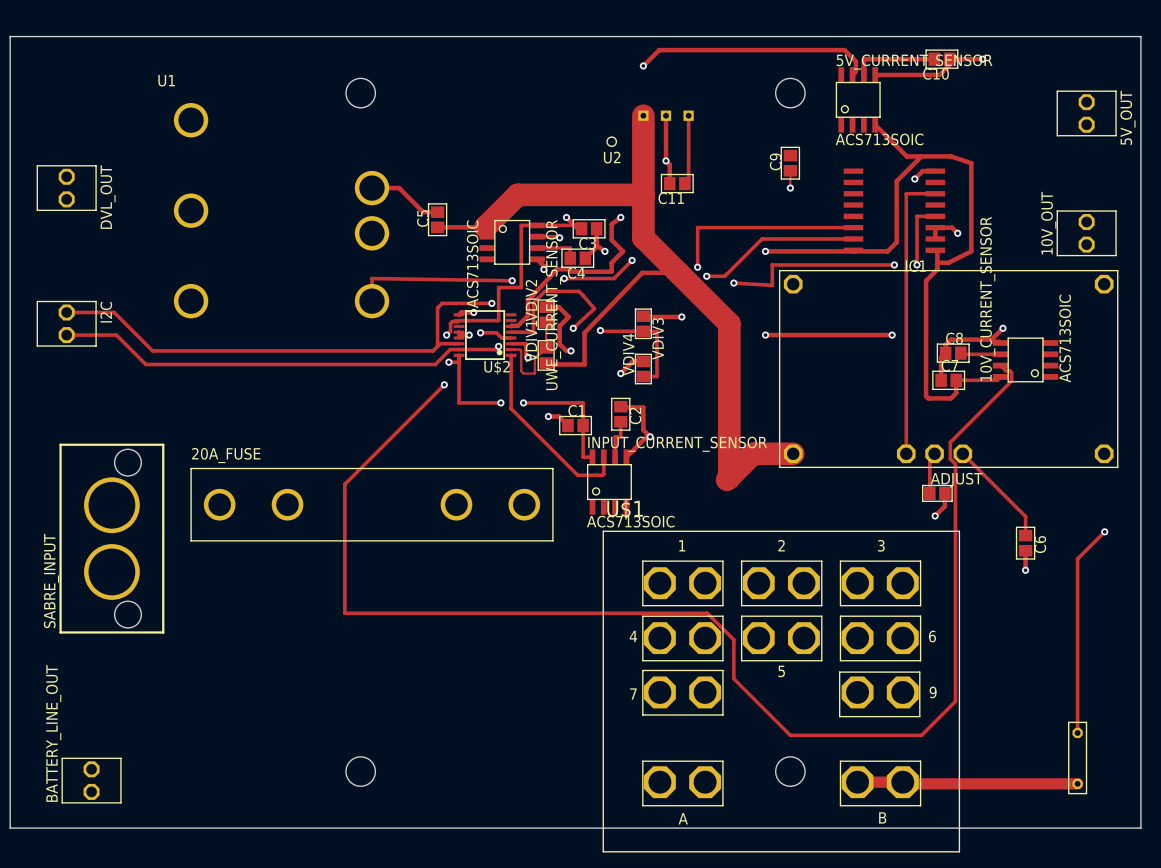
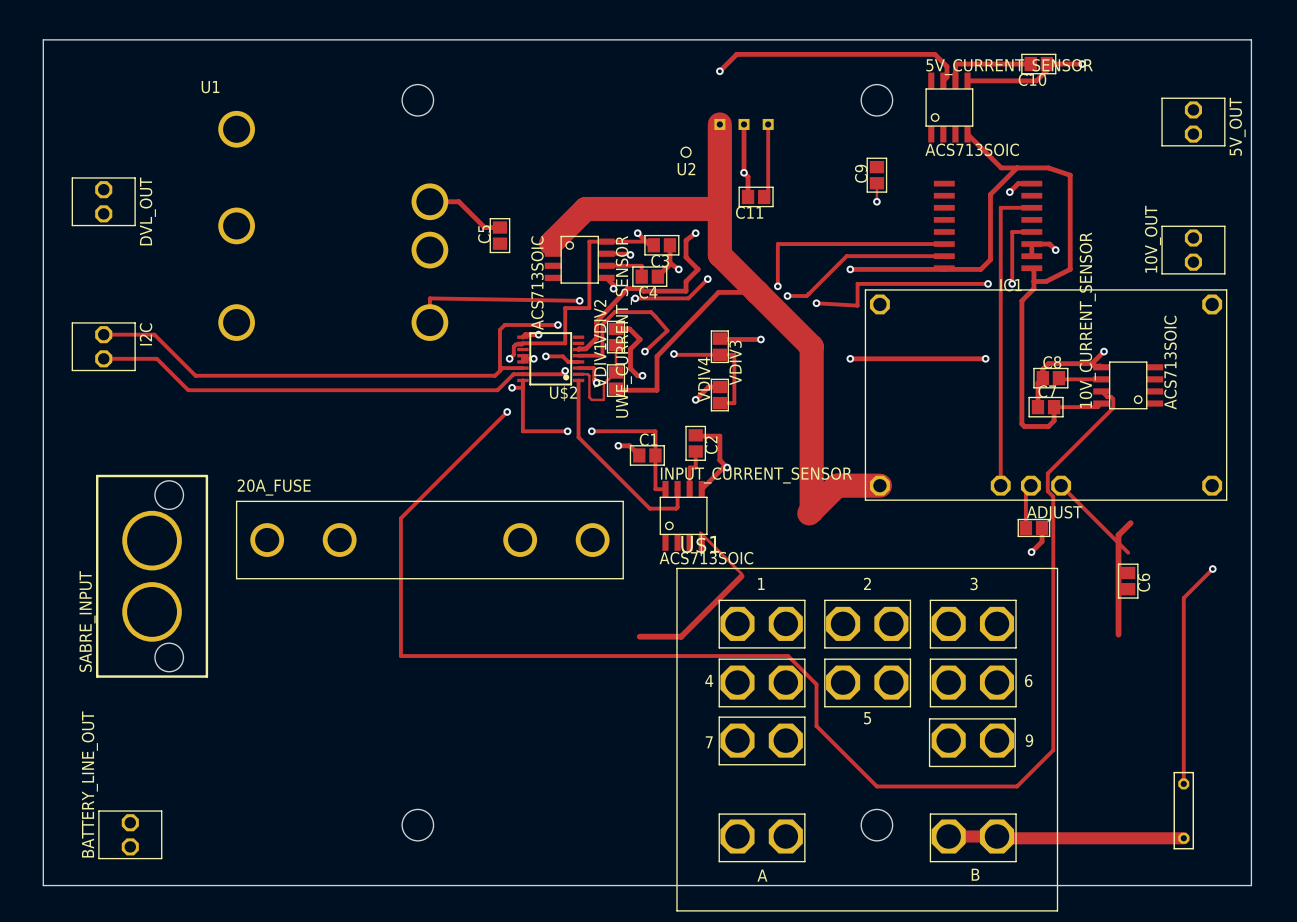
track: (437, 227) (485, 227) -> none
track: none -> (1130, 523) (1118, 535) (1118, 634)
track: none -> (700, 532) (741, 573) (741, 576) (681, 636) (640, 636)
track: (1025, 516) (1025, 535) -> none
track: (1025, 550) (1025, 570) -> none
via: (1025, 570) -> none

